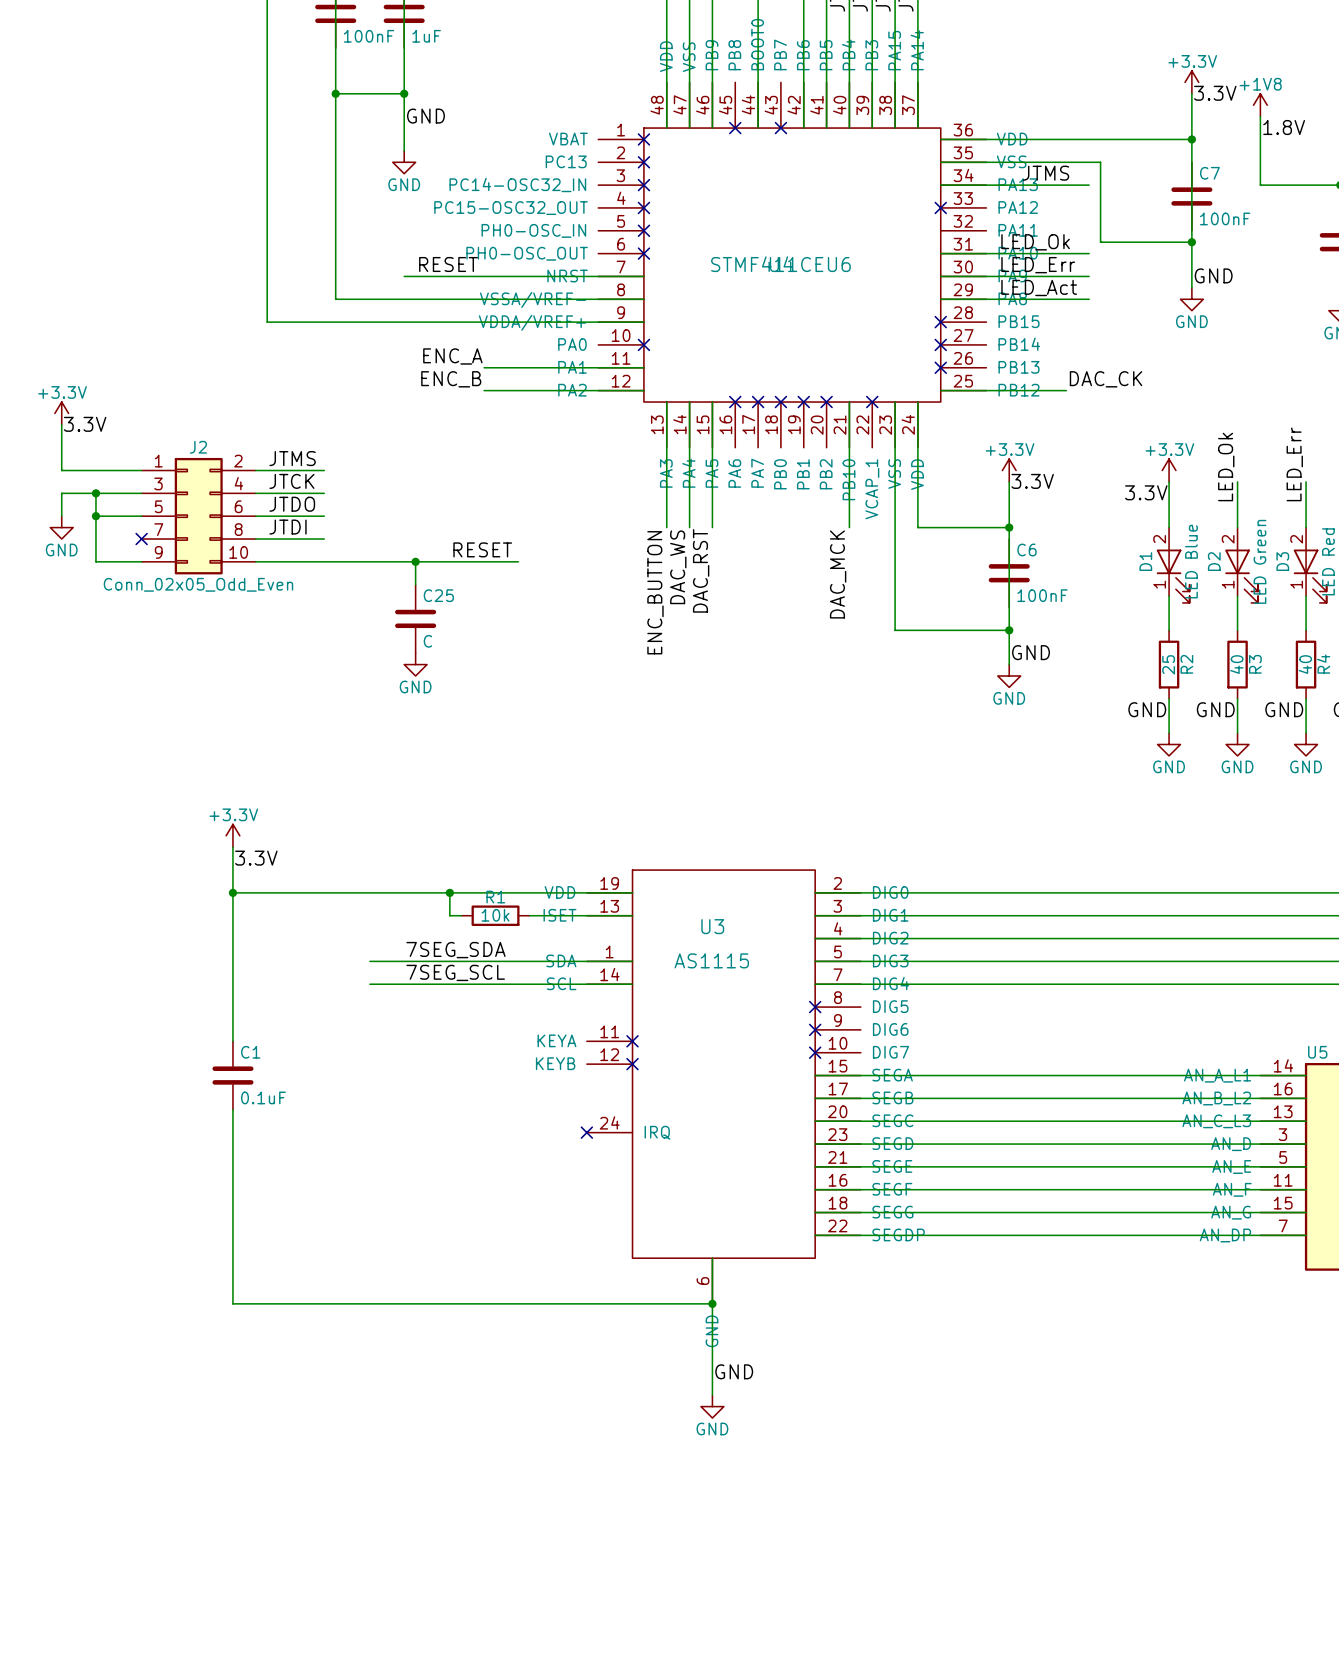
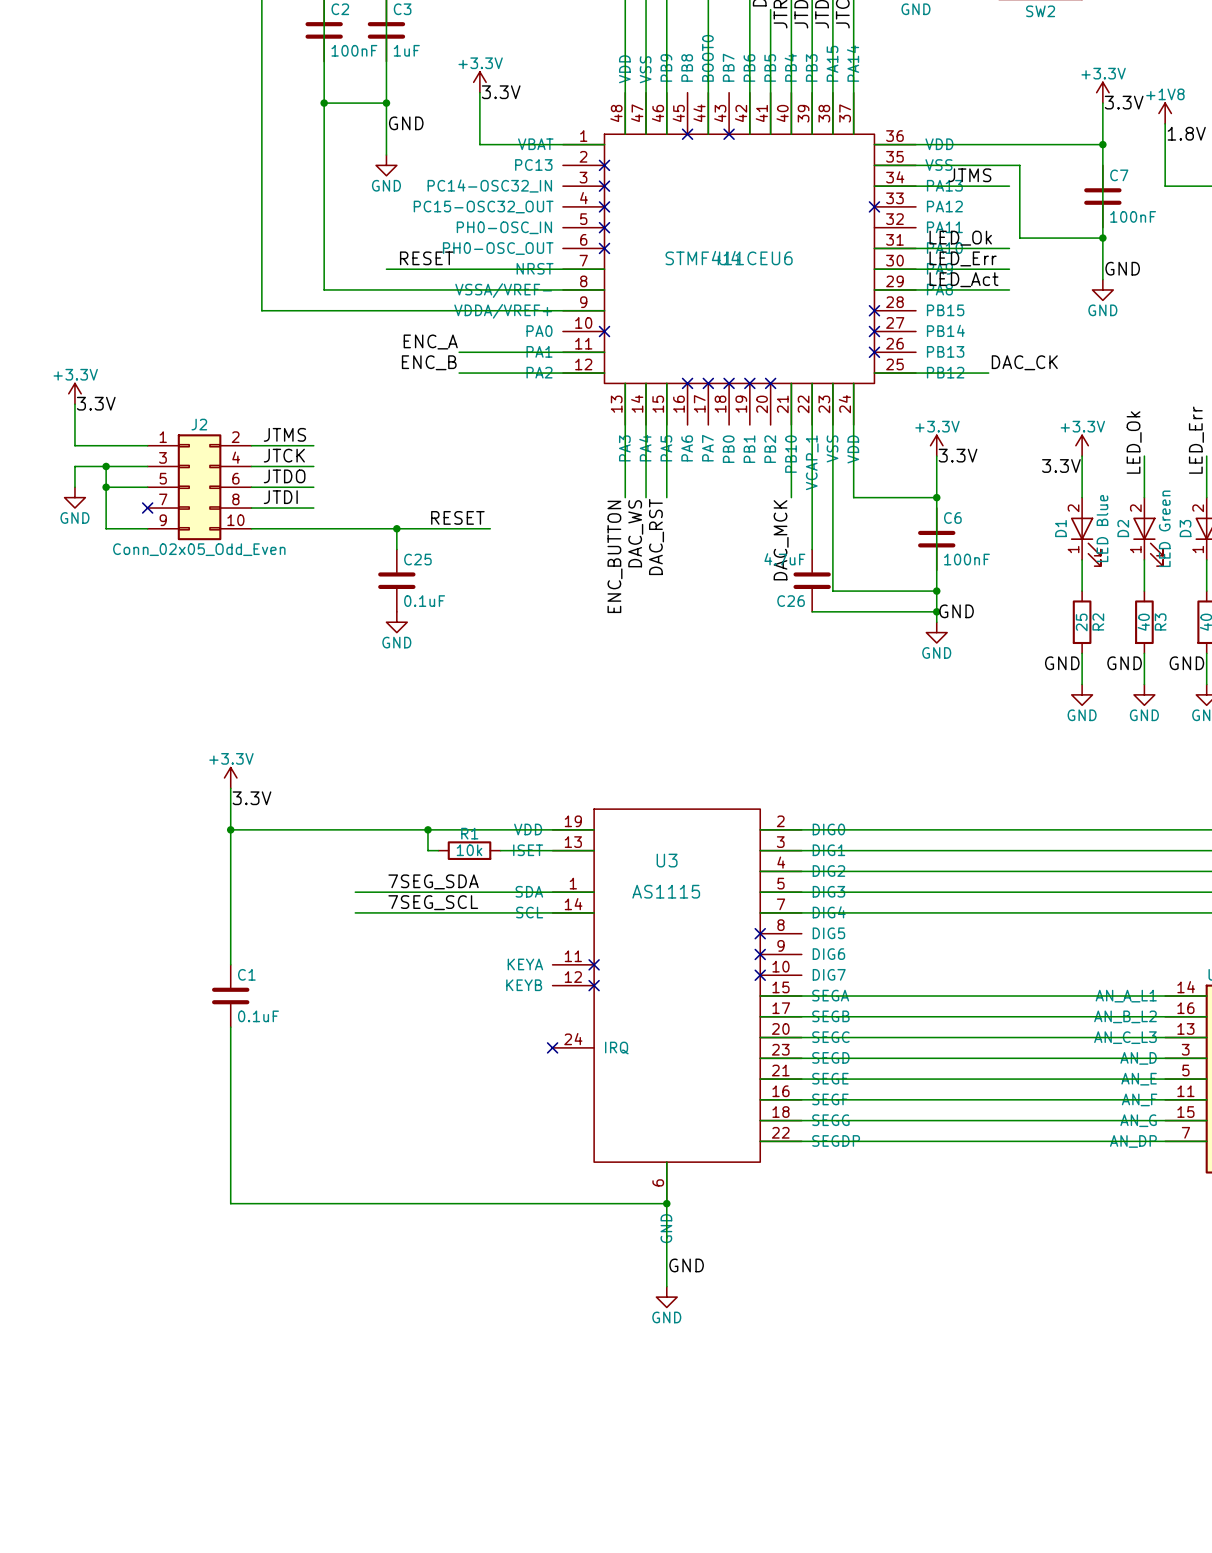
power symbol: none -> +3.3V (479, 82)
label: none -> 3.3V (501, 92)
wire: none -> (479, 92) (479, 144) (604, 144)
no-connect mark: (643, 139) -> none
wire: none -> (812, 383) (812, 549)
no-connect mark: (872, 402) -> none
C26: none -> 4.7uF (812, 580)
C25 value: C (427, 641) -> 0.1uF (424, 601)
wire: none -> (812, 611) (936, 611)
junction: none -> (936, 611)

